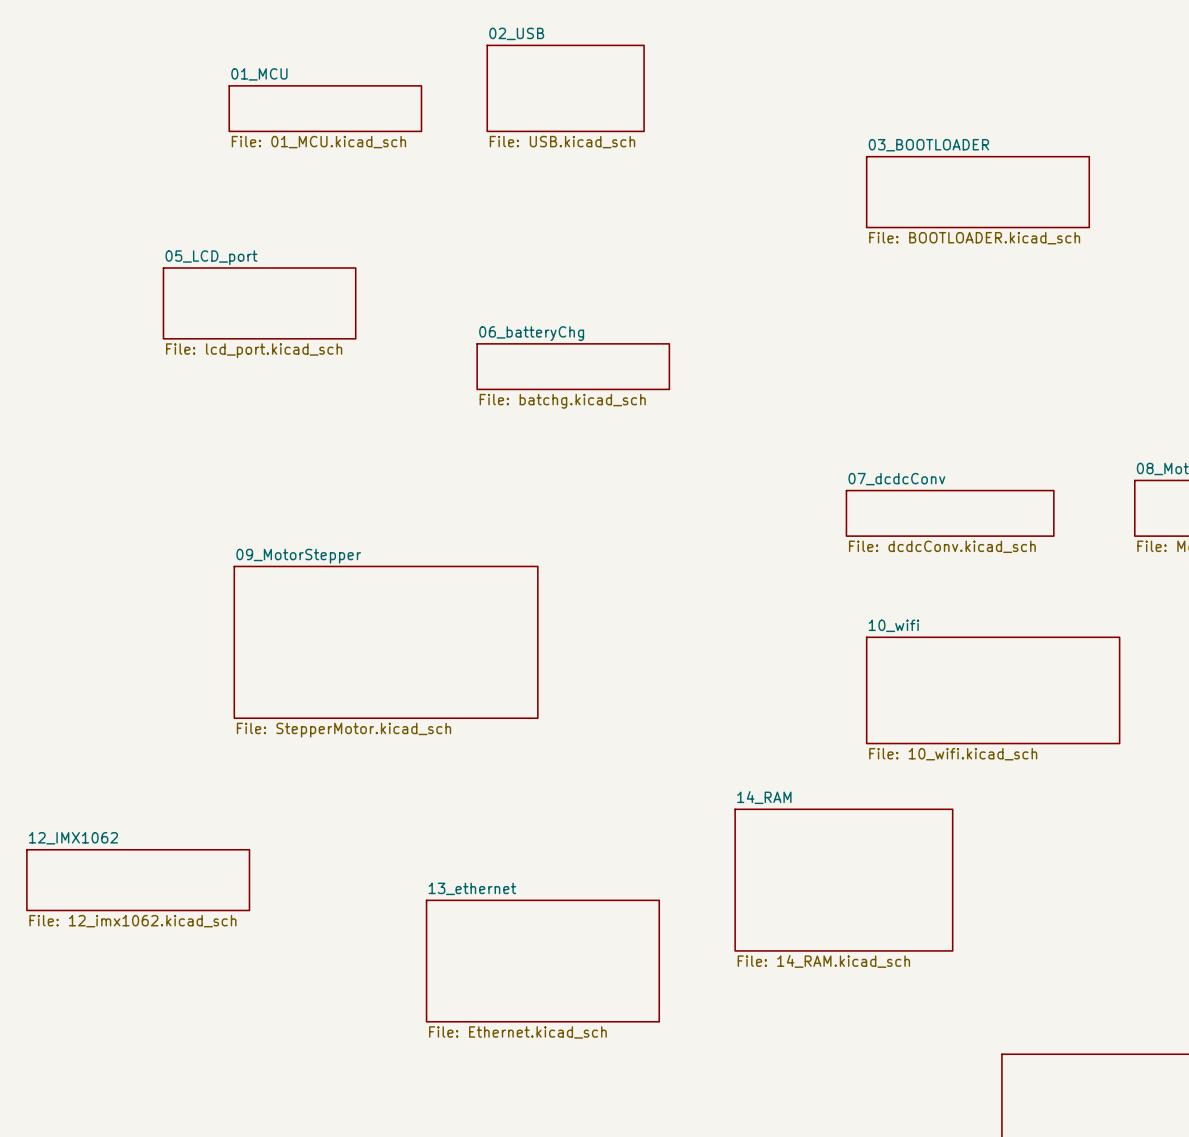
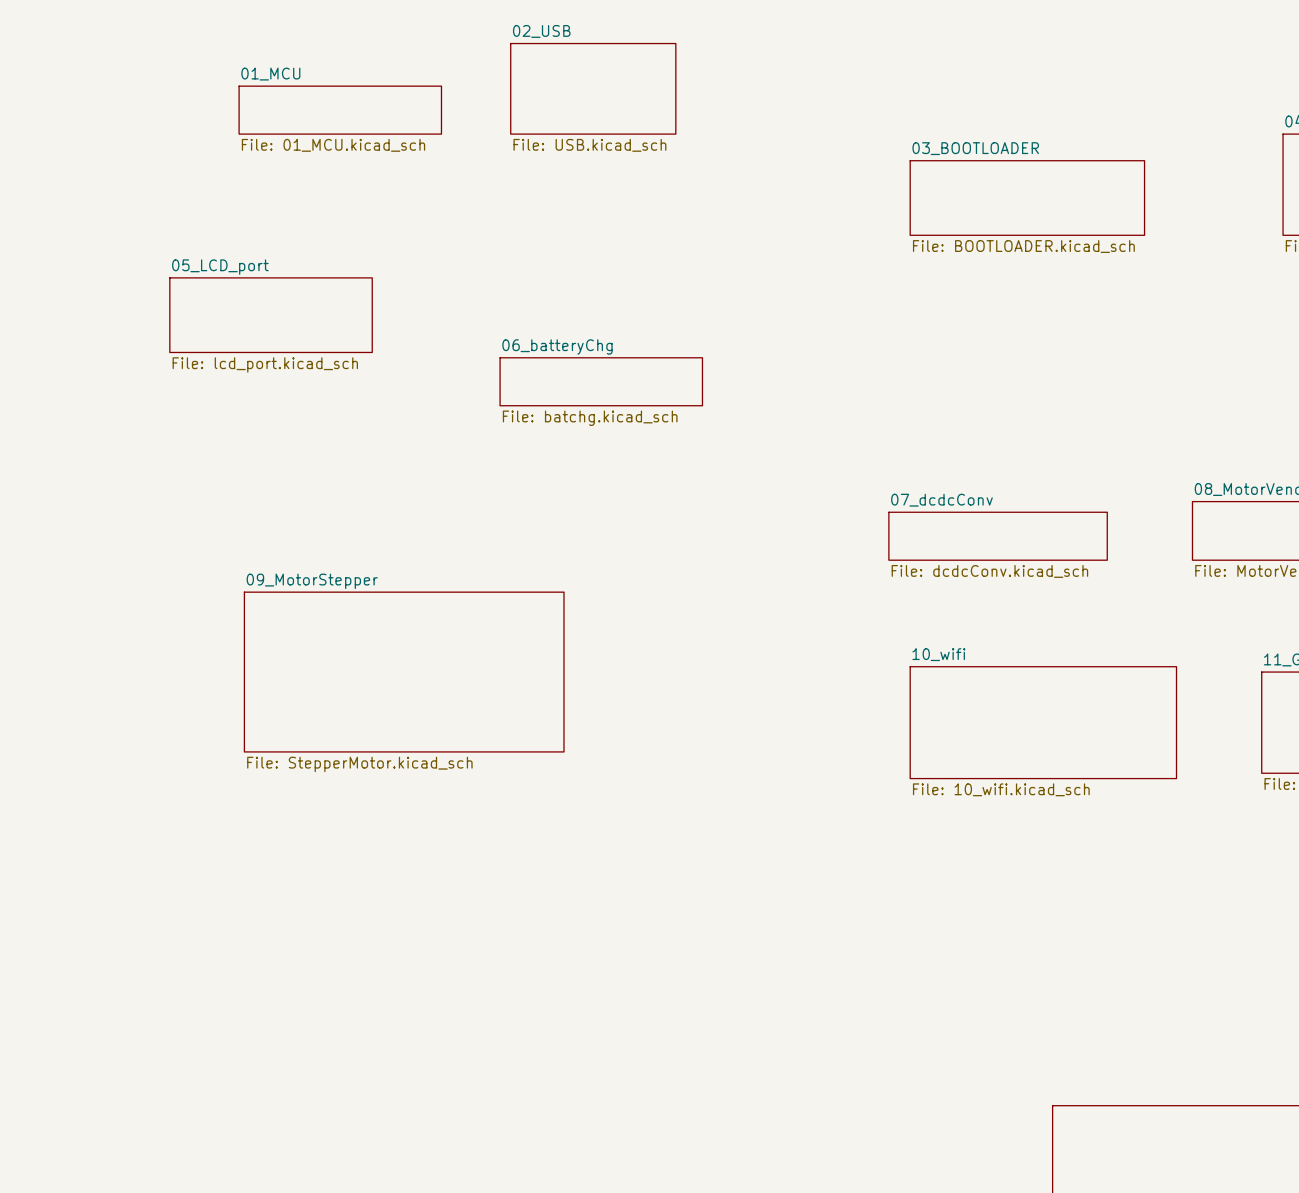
sheet 12_IMX1062: File: 12_imx1062.kicad_sch (138, 880) -> none
sheet 14_RAM: File: 14_RAM.kicad_sch (843, 880) -> none
sheet 13_ethernet: File: Ethernet.kicad_sch (542, 961) -> none

